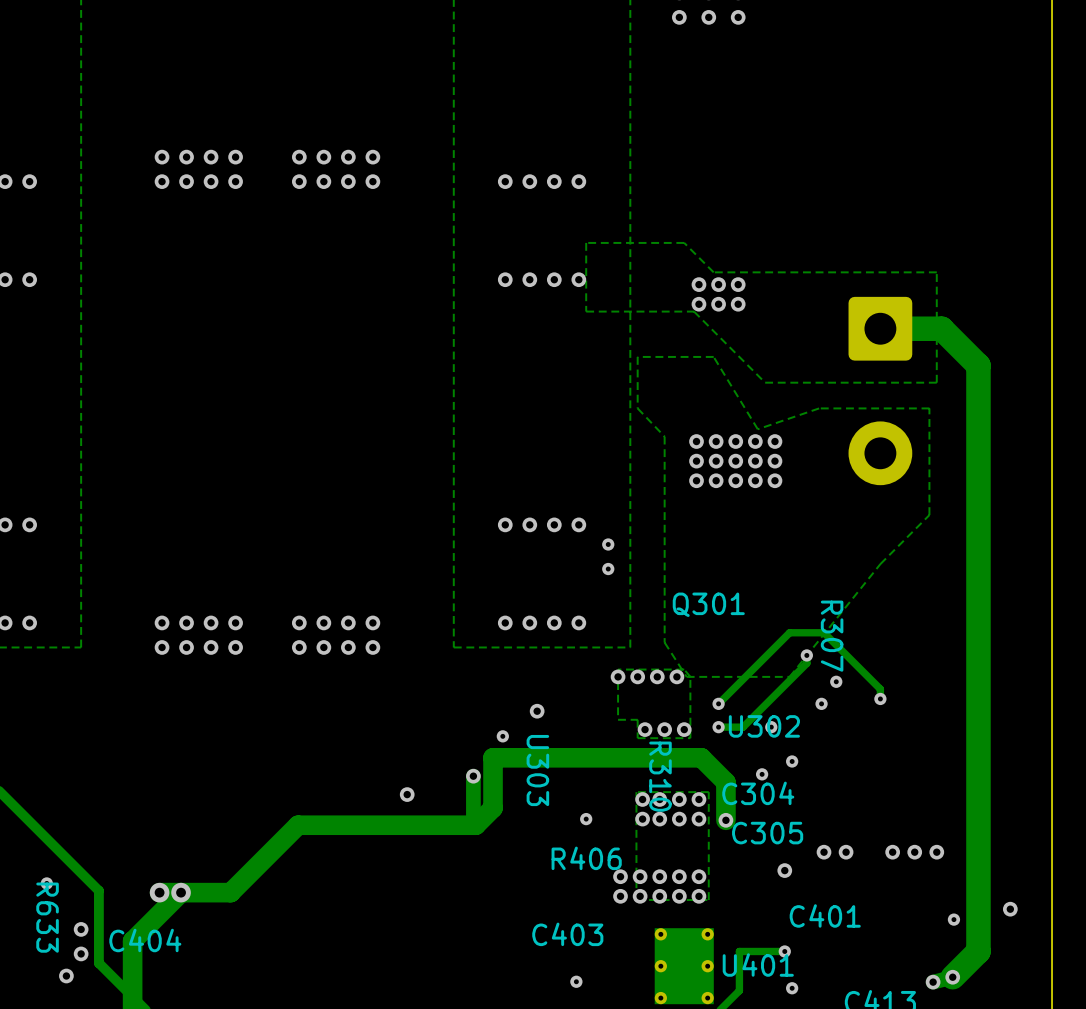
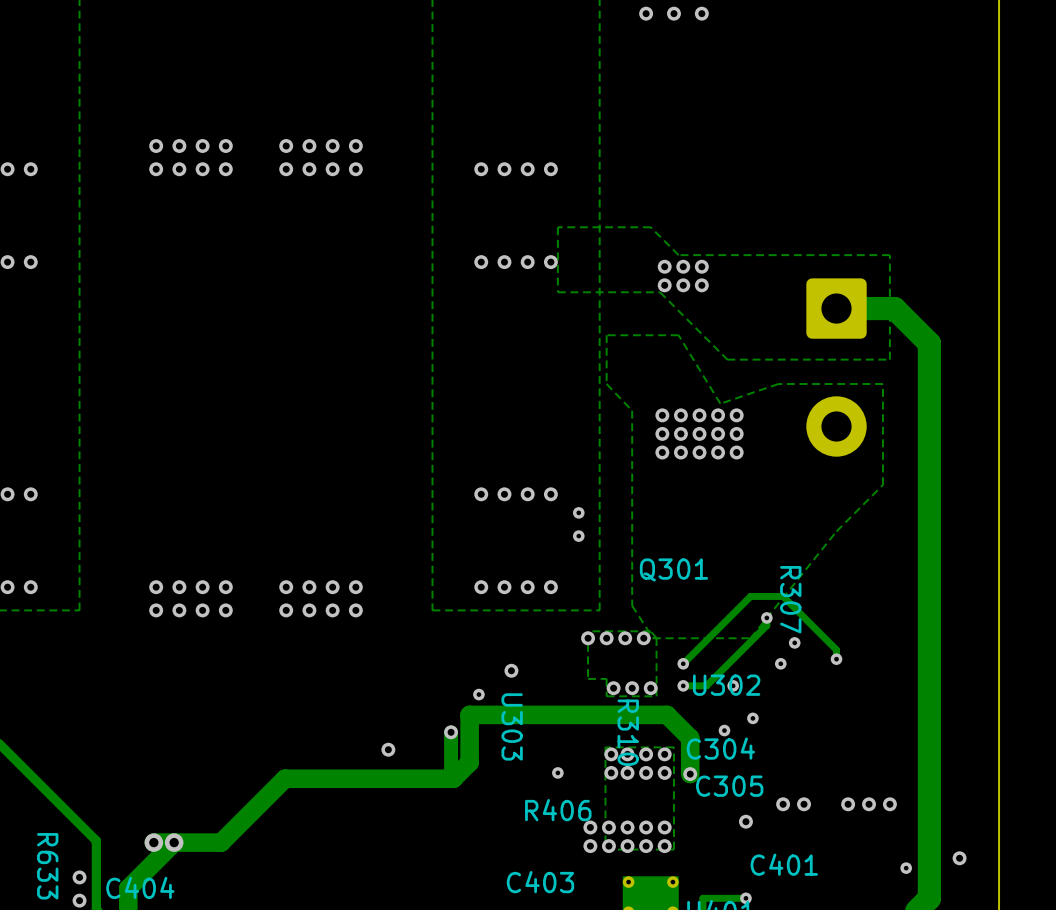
via: (46, 883) -> none

